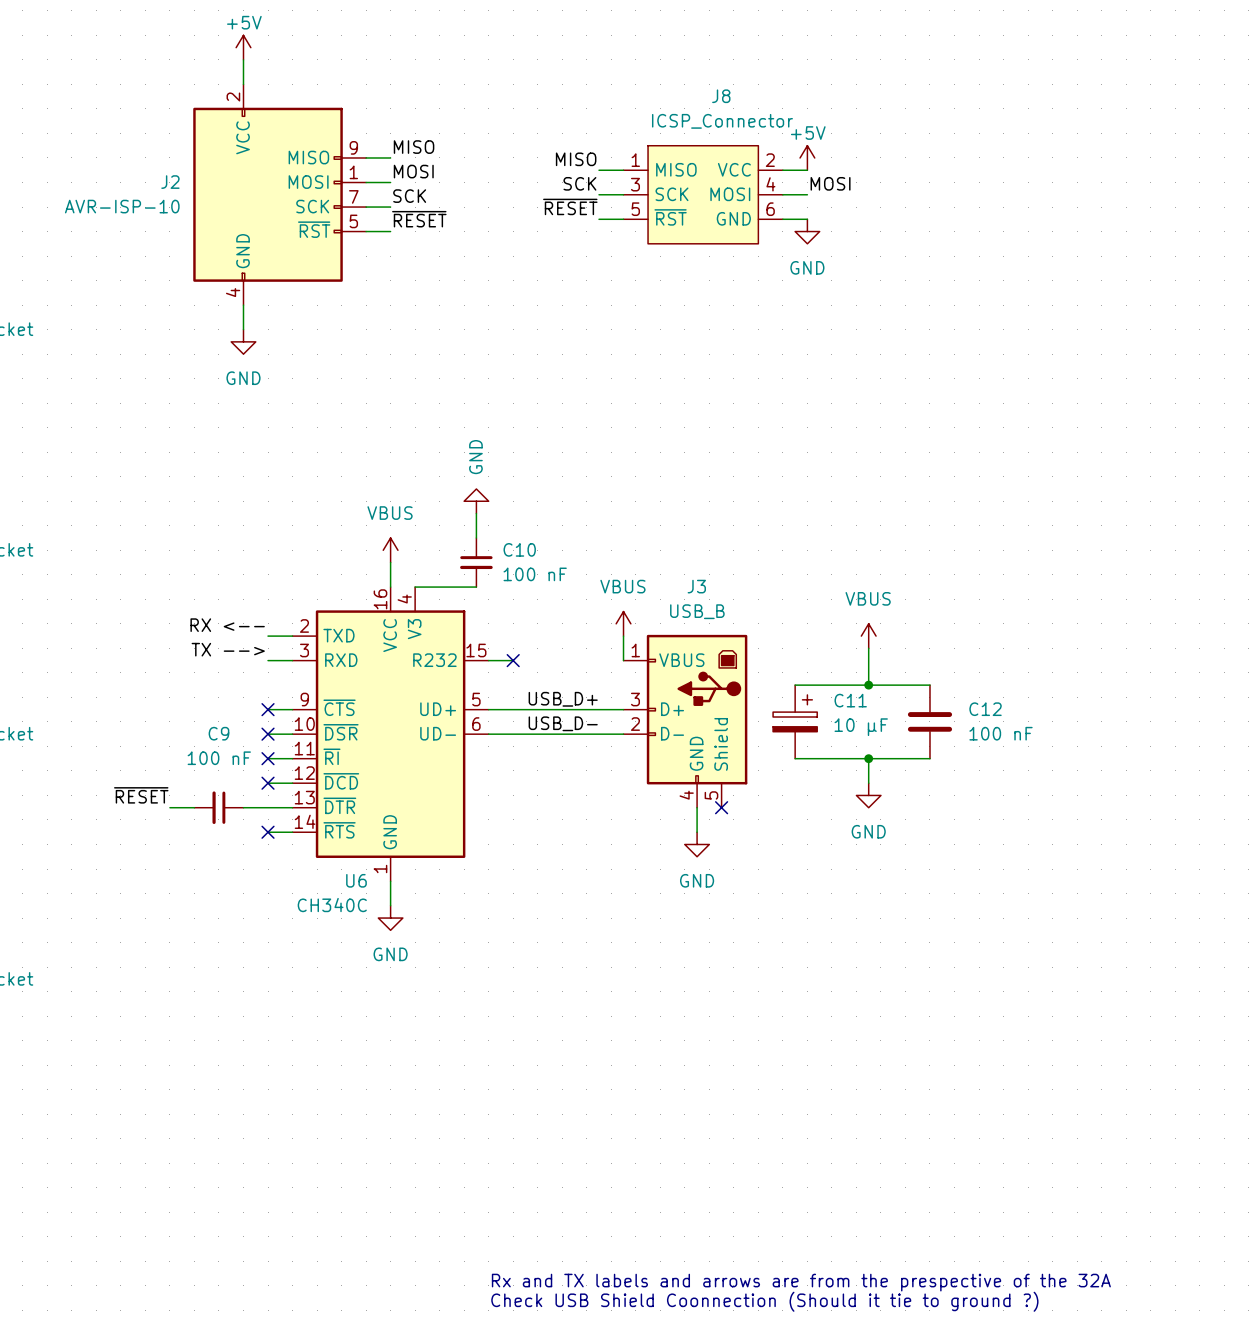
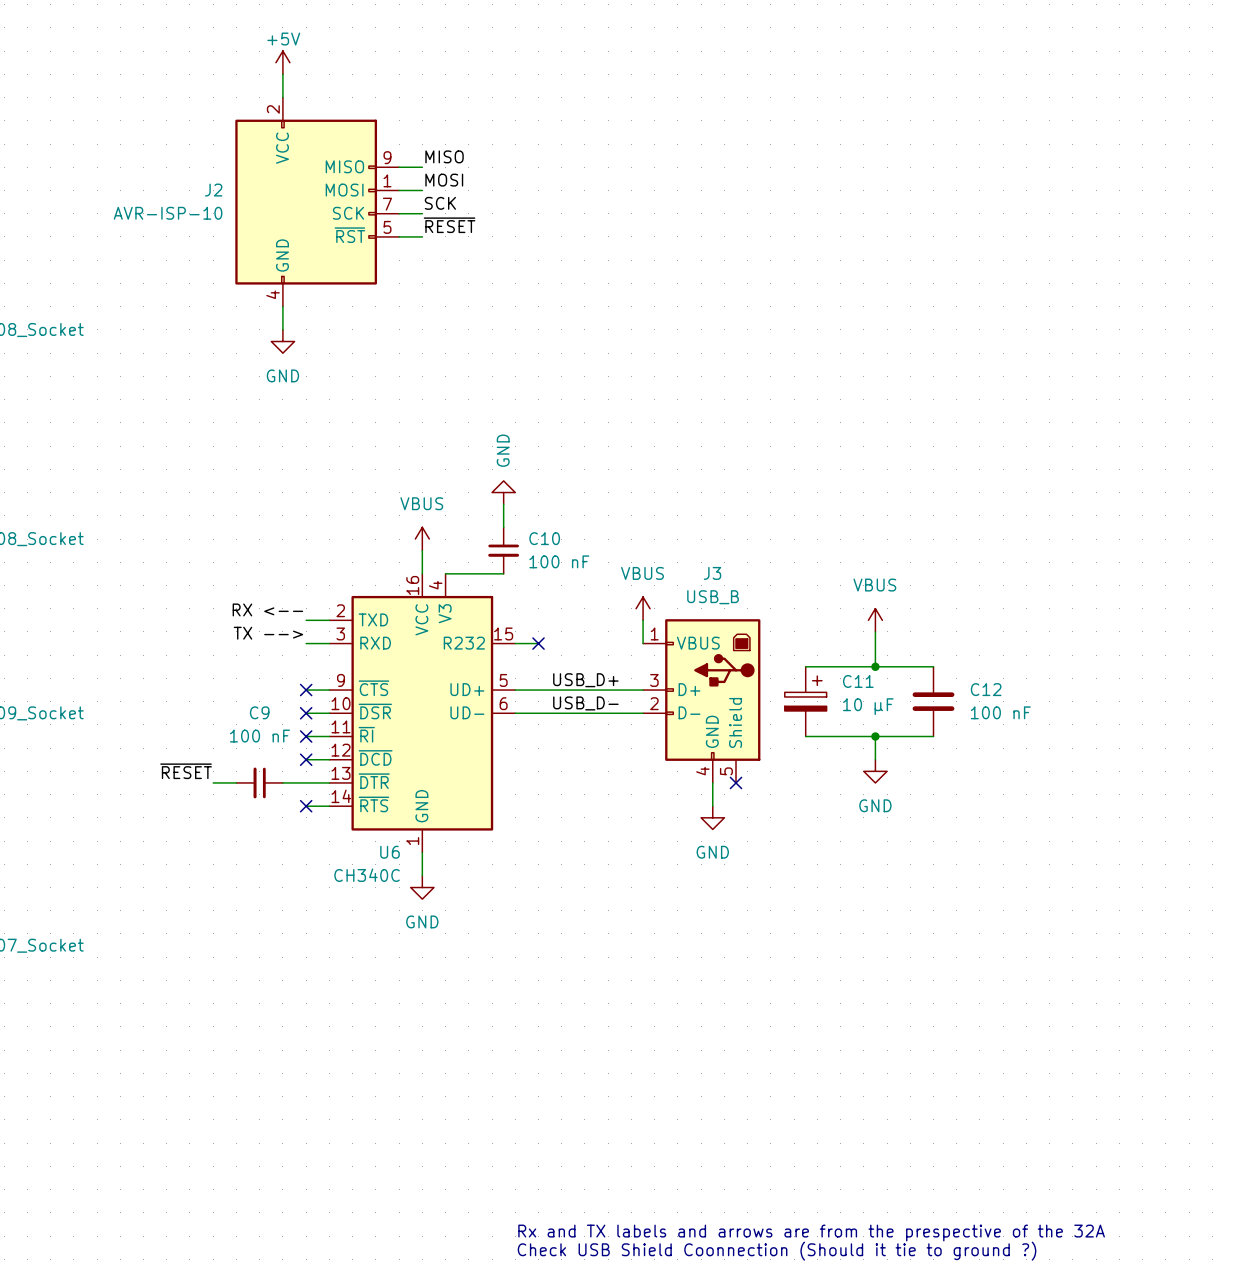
power symbol: +5V (807, 157) -> none
label: MISO (576, 159) -> none
wire: (599, 170) (623, 170) -> none
wire: (782, 170) (807, 170) -> none
label: SCK (579, 183) -> none
label: MOSI (830, 183) -> none
wire: (599, 194) (623, 194) -> none
J8: ICSP_Connector (709, 194) -> none
wire: (782, 194) (807, 194) -> none
label: ~{RESET} (570, 206) -> none
wire: (599, 219) (623, 219) -> none
wire: (782, 219) (807, 219) -> none
power symbol: GND (807, 231) -> none

